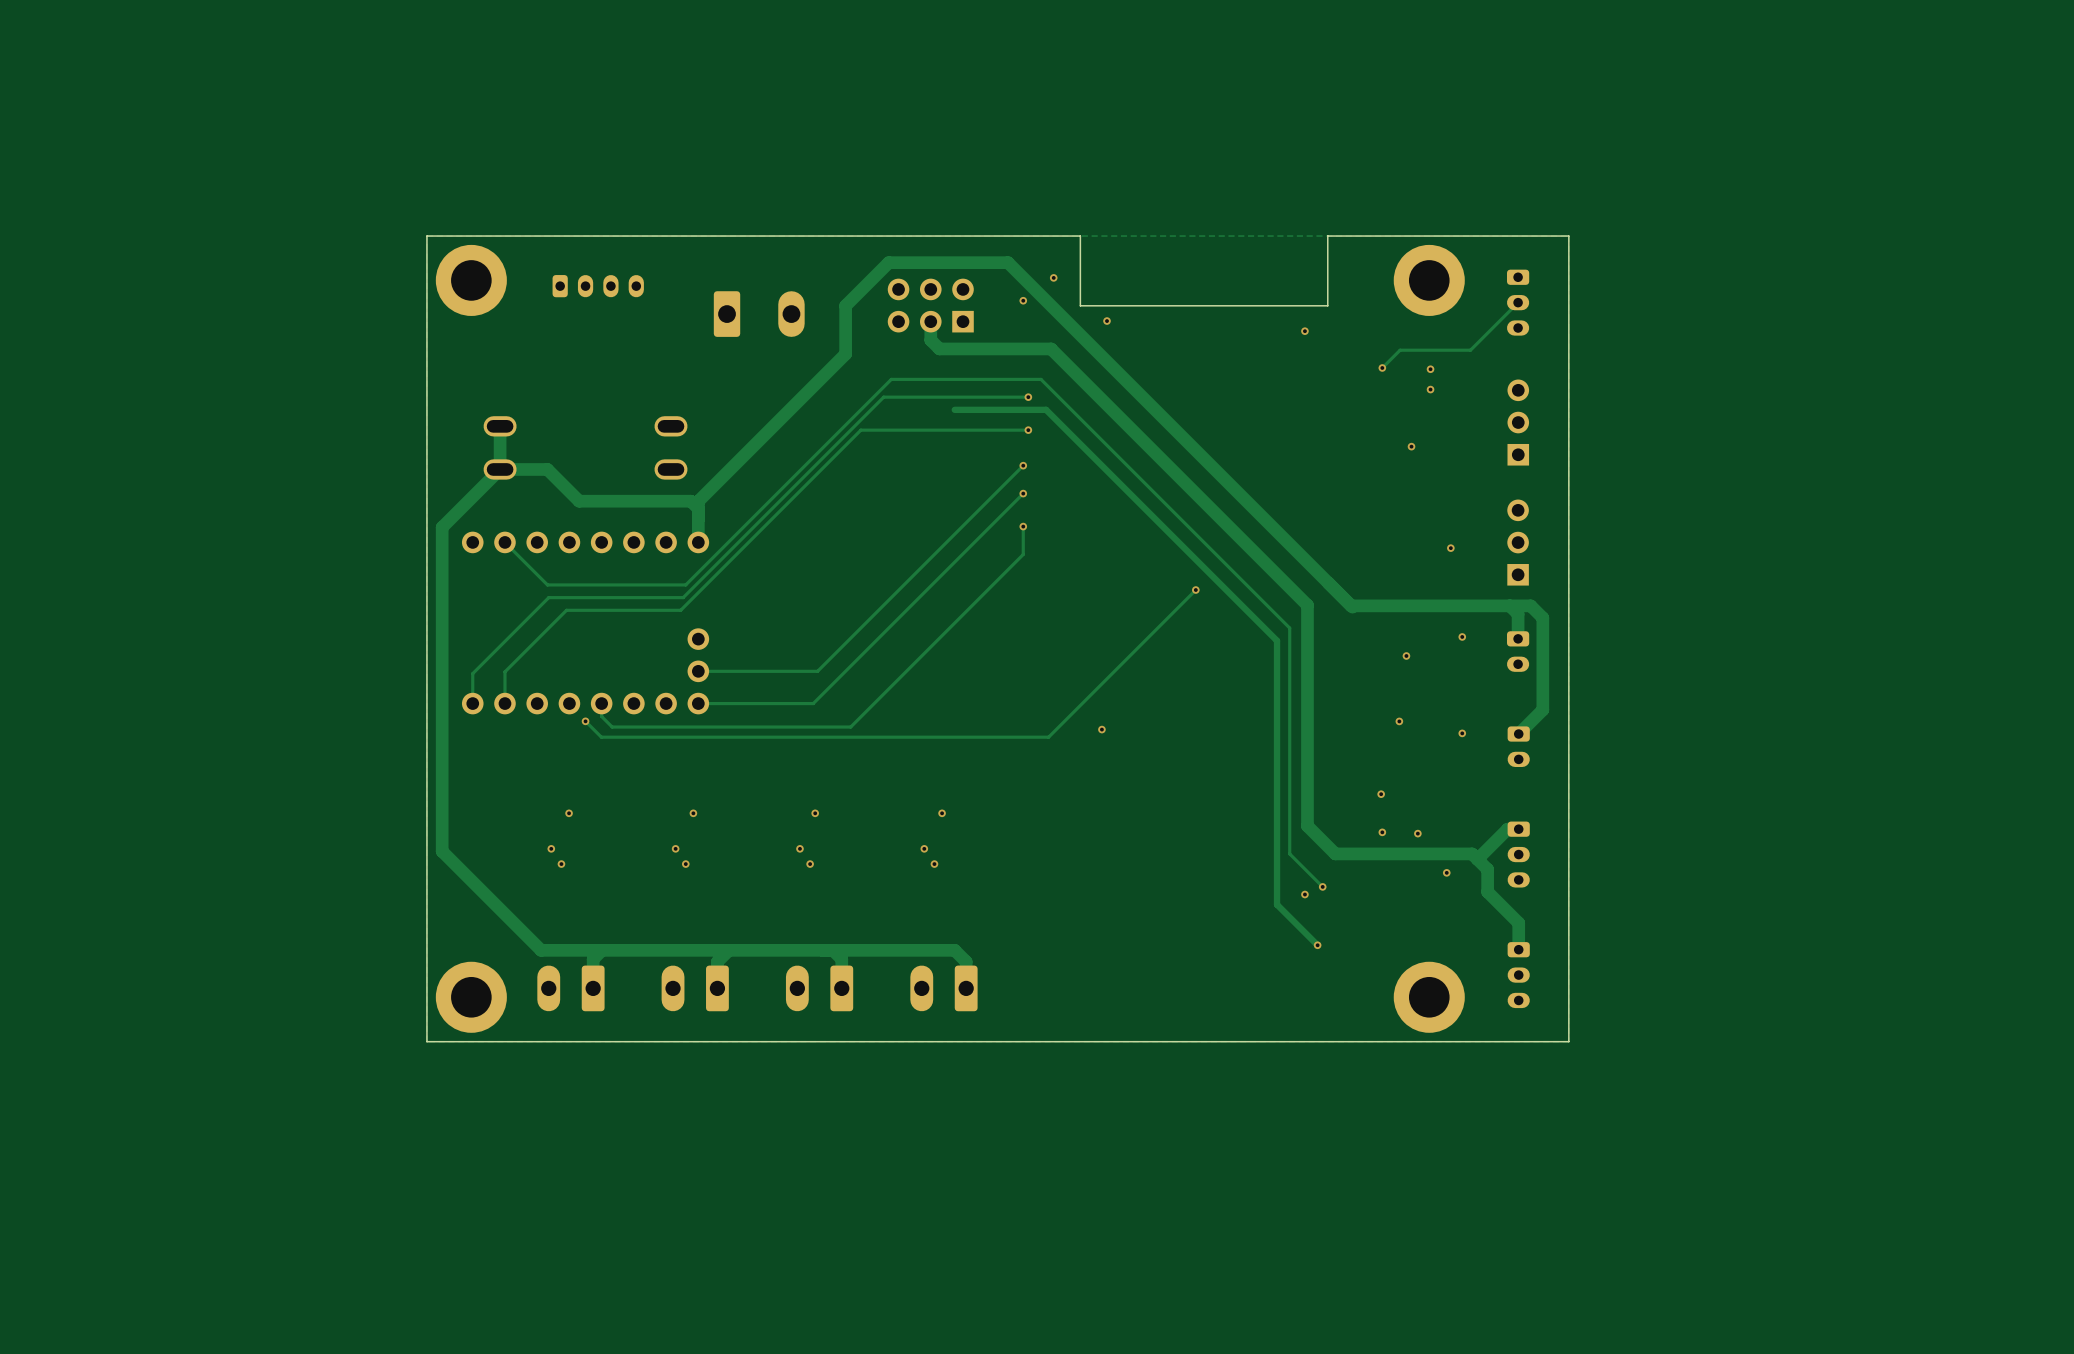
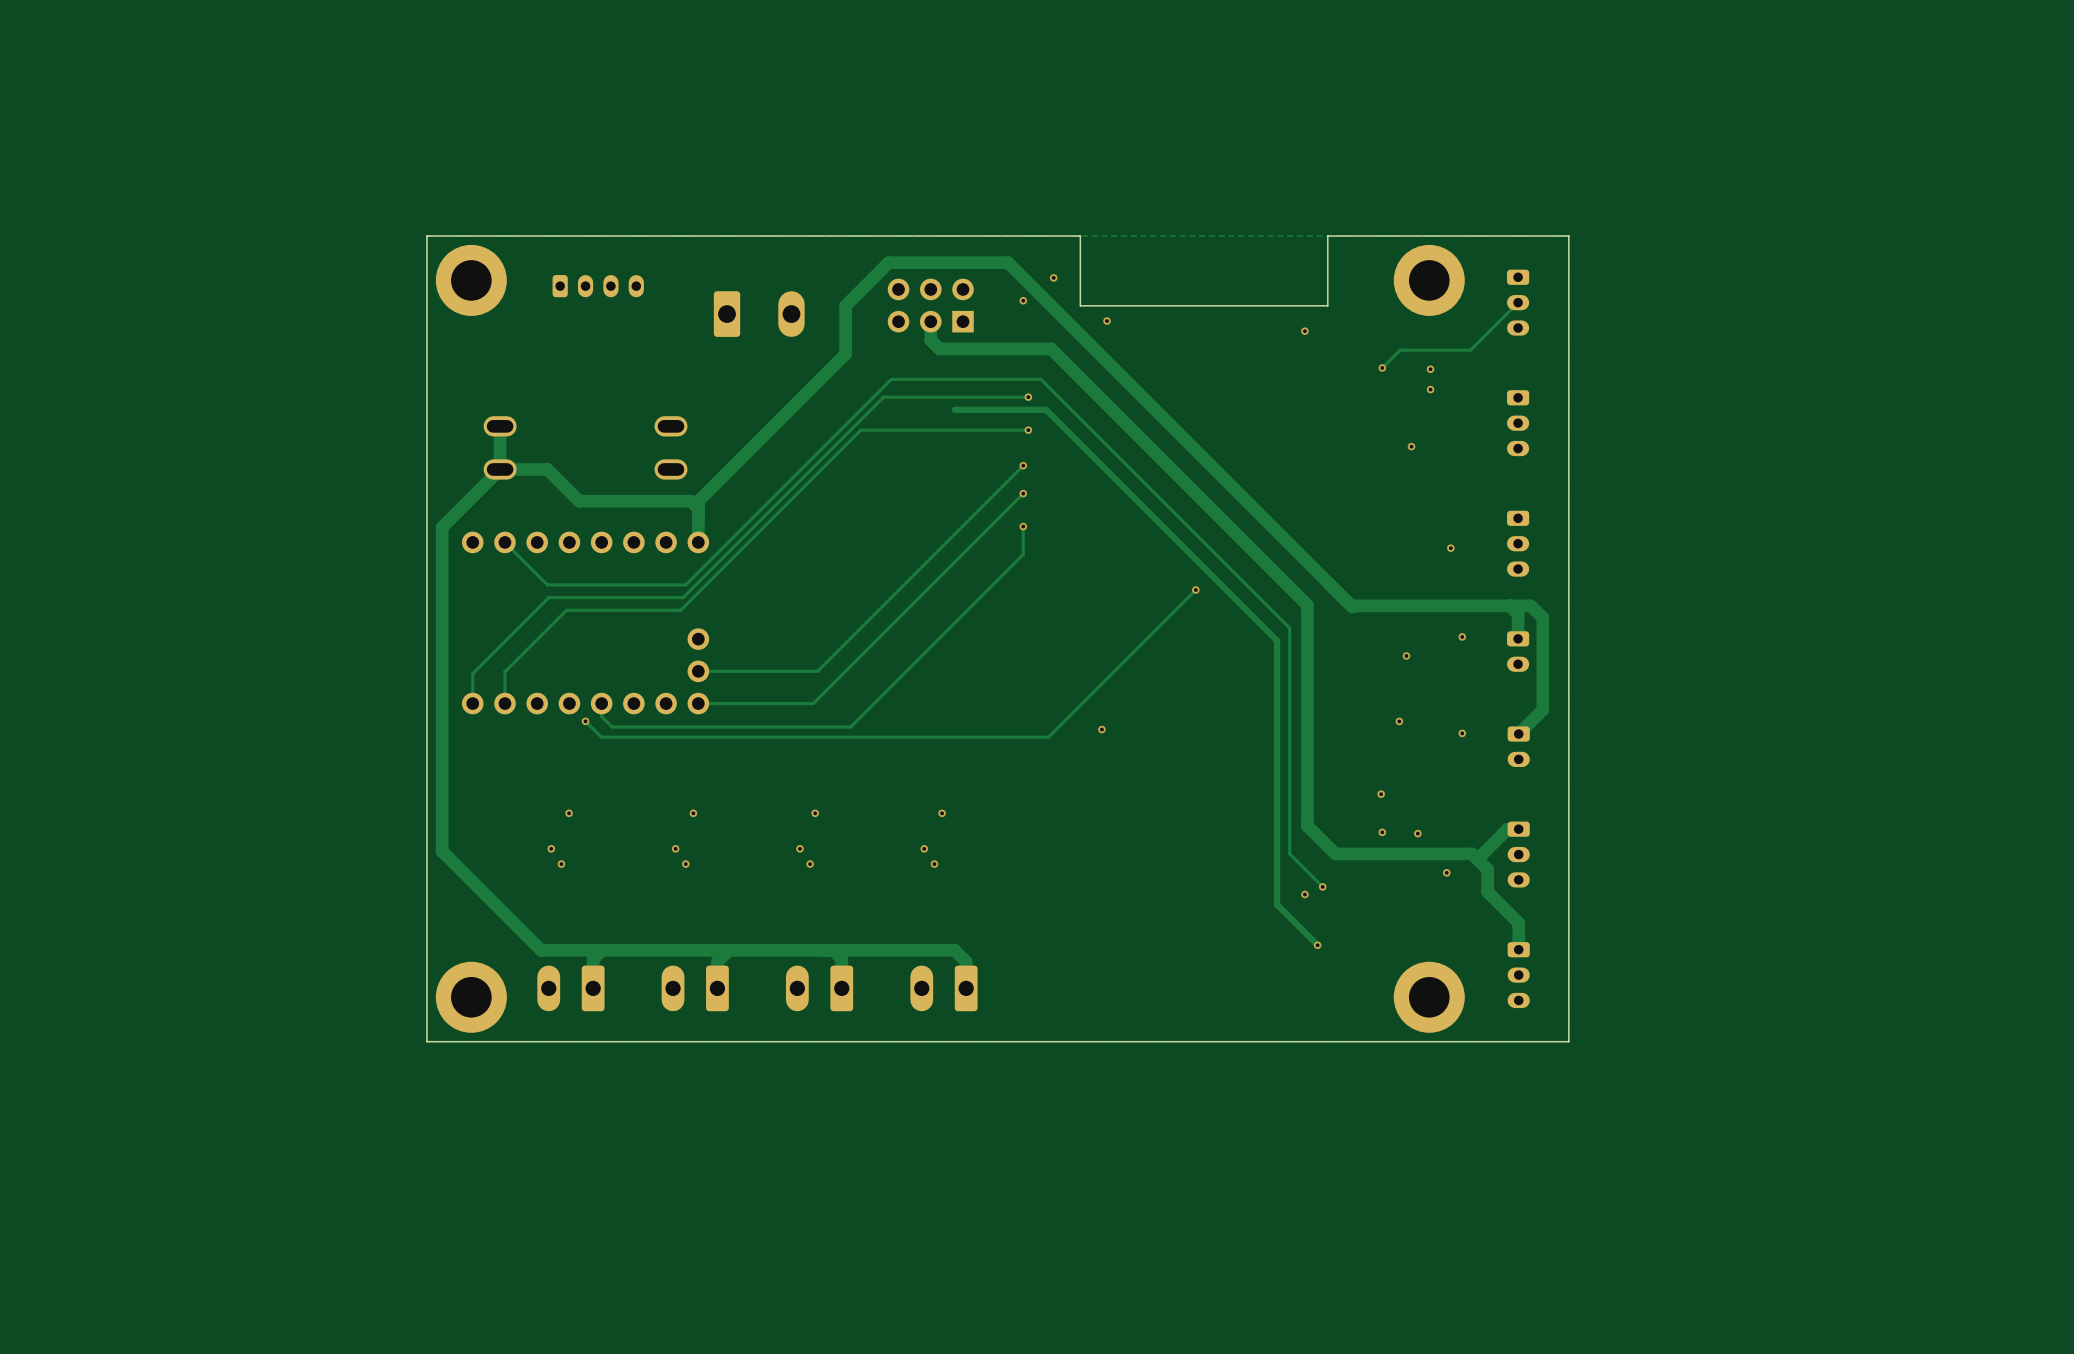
part footprint: [1507, 379, 1530, 466] -> [1506, 390, 1530, 457]
part footprint: [1507, 499, 1529, 586] -> [1506, 510, 1530, 577]

